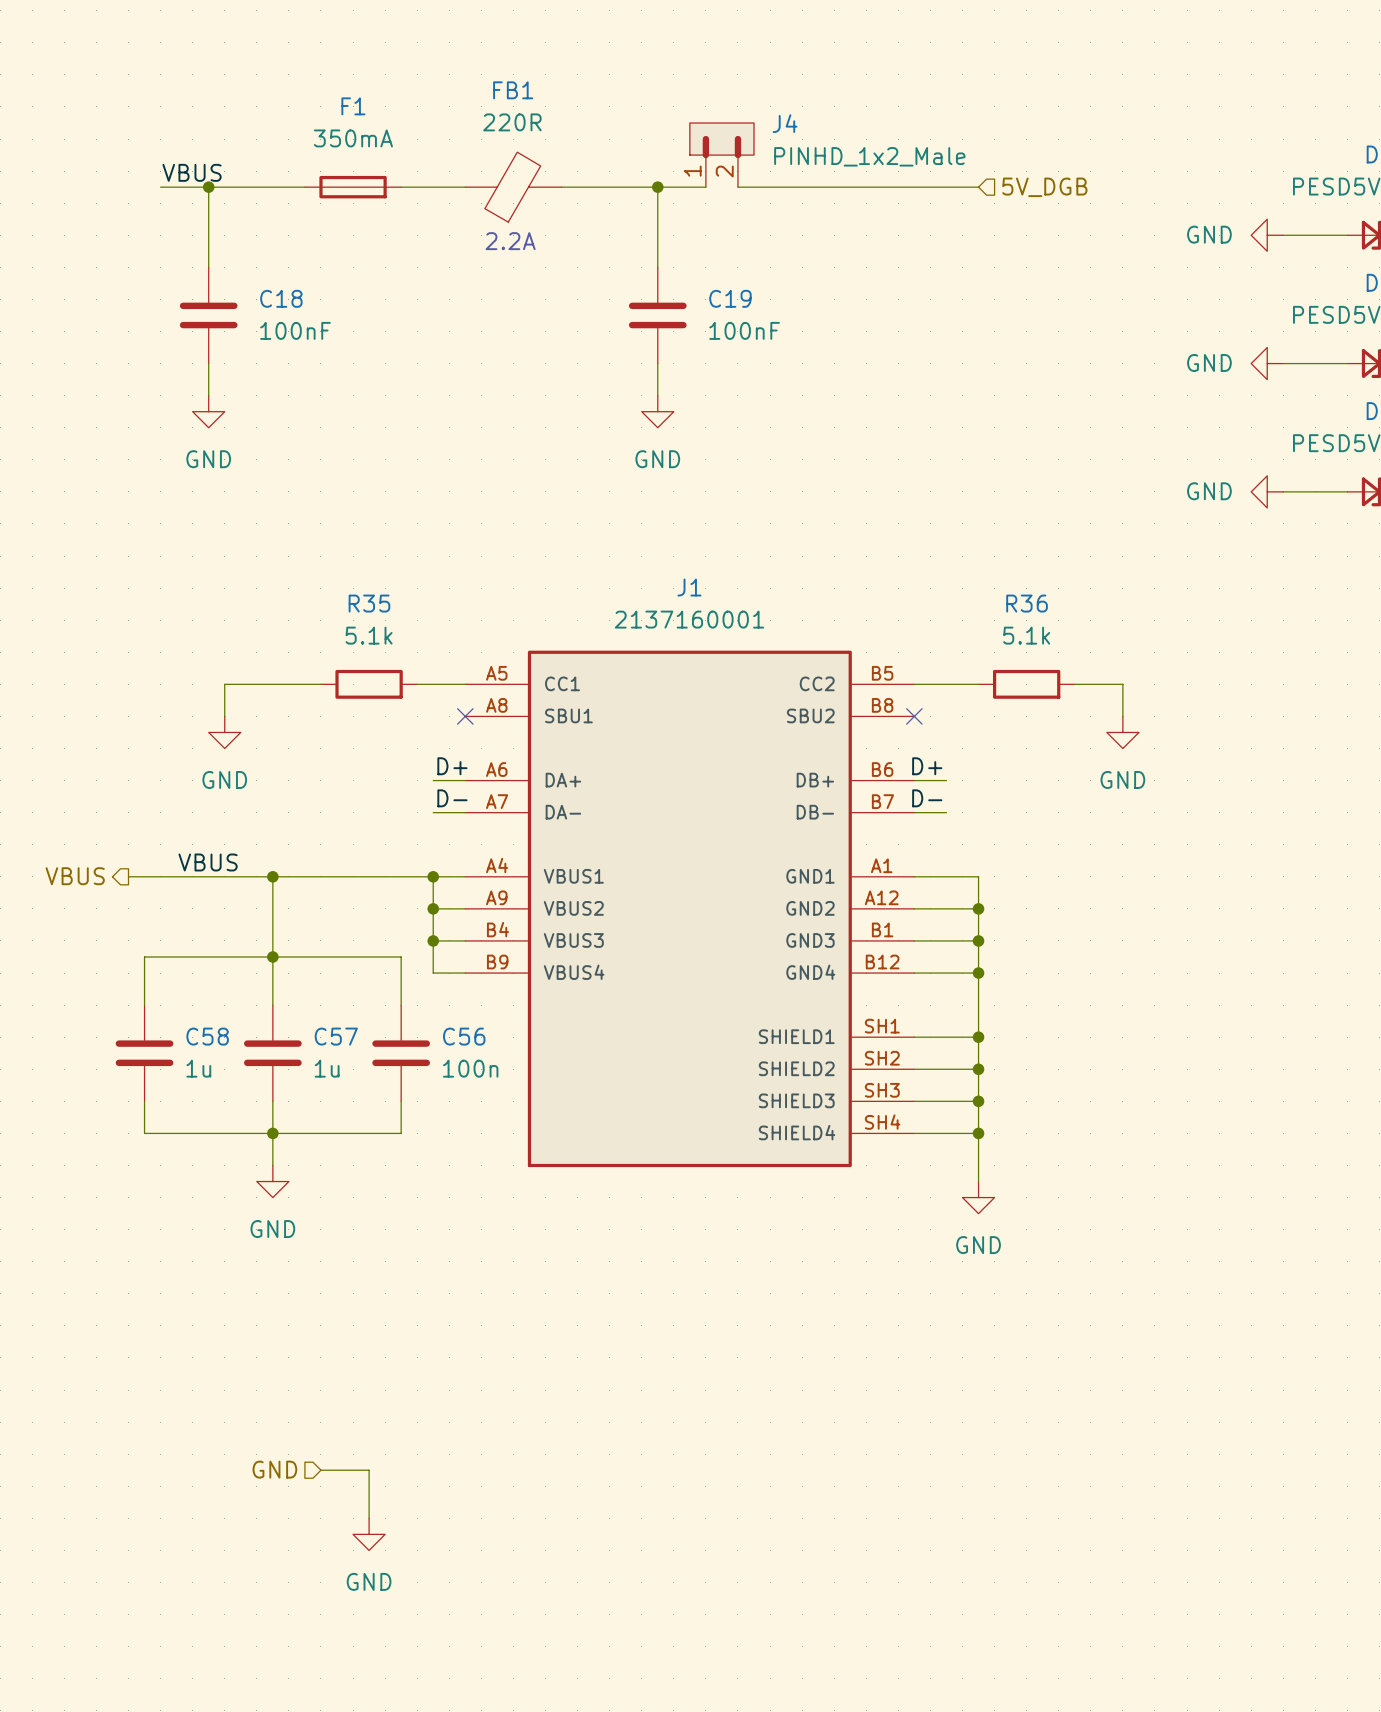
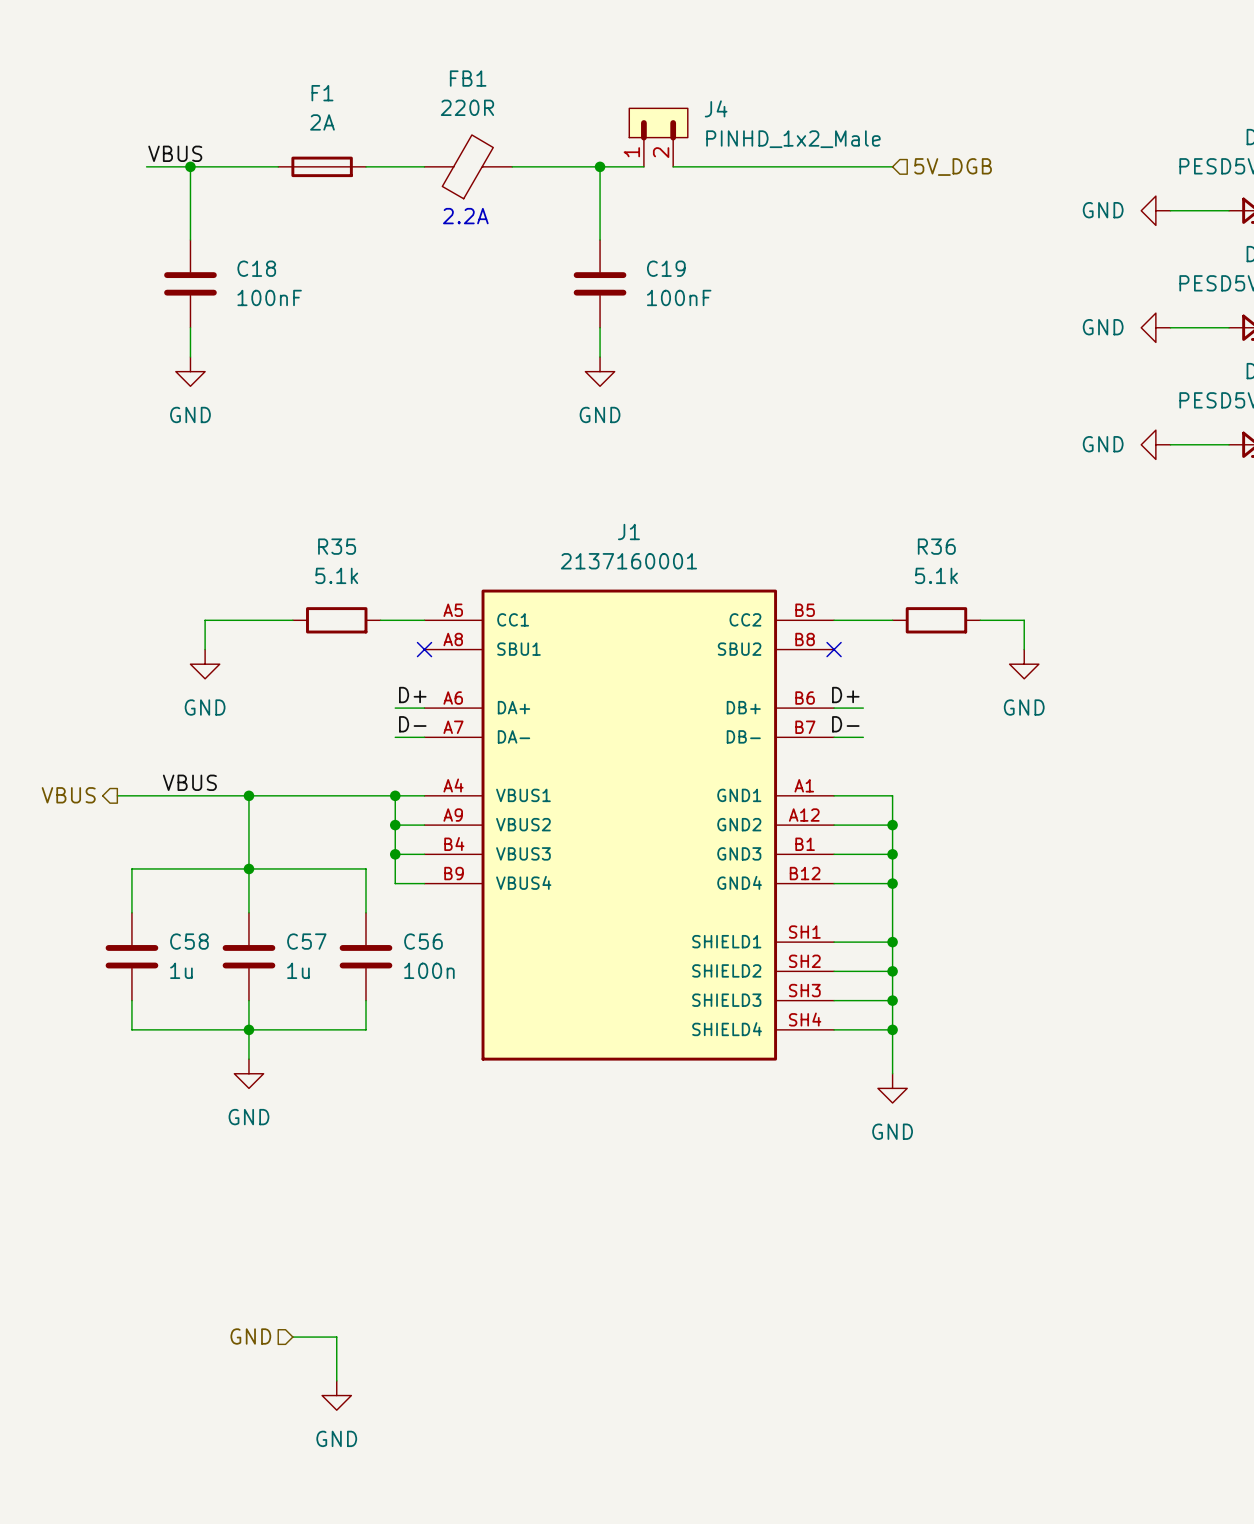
F1 value: 350mA (353, 138) -> 2A (322, 122)

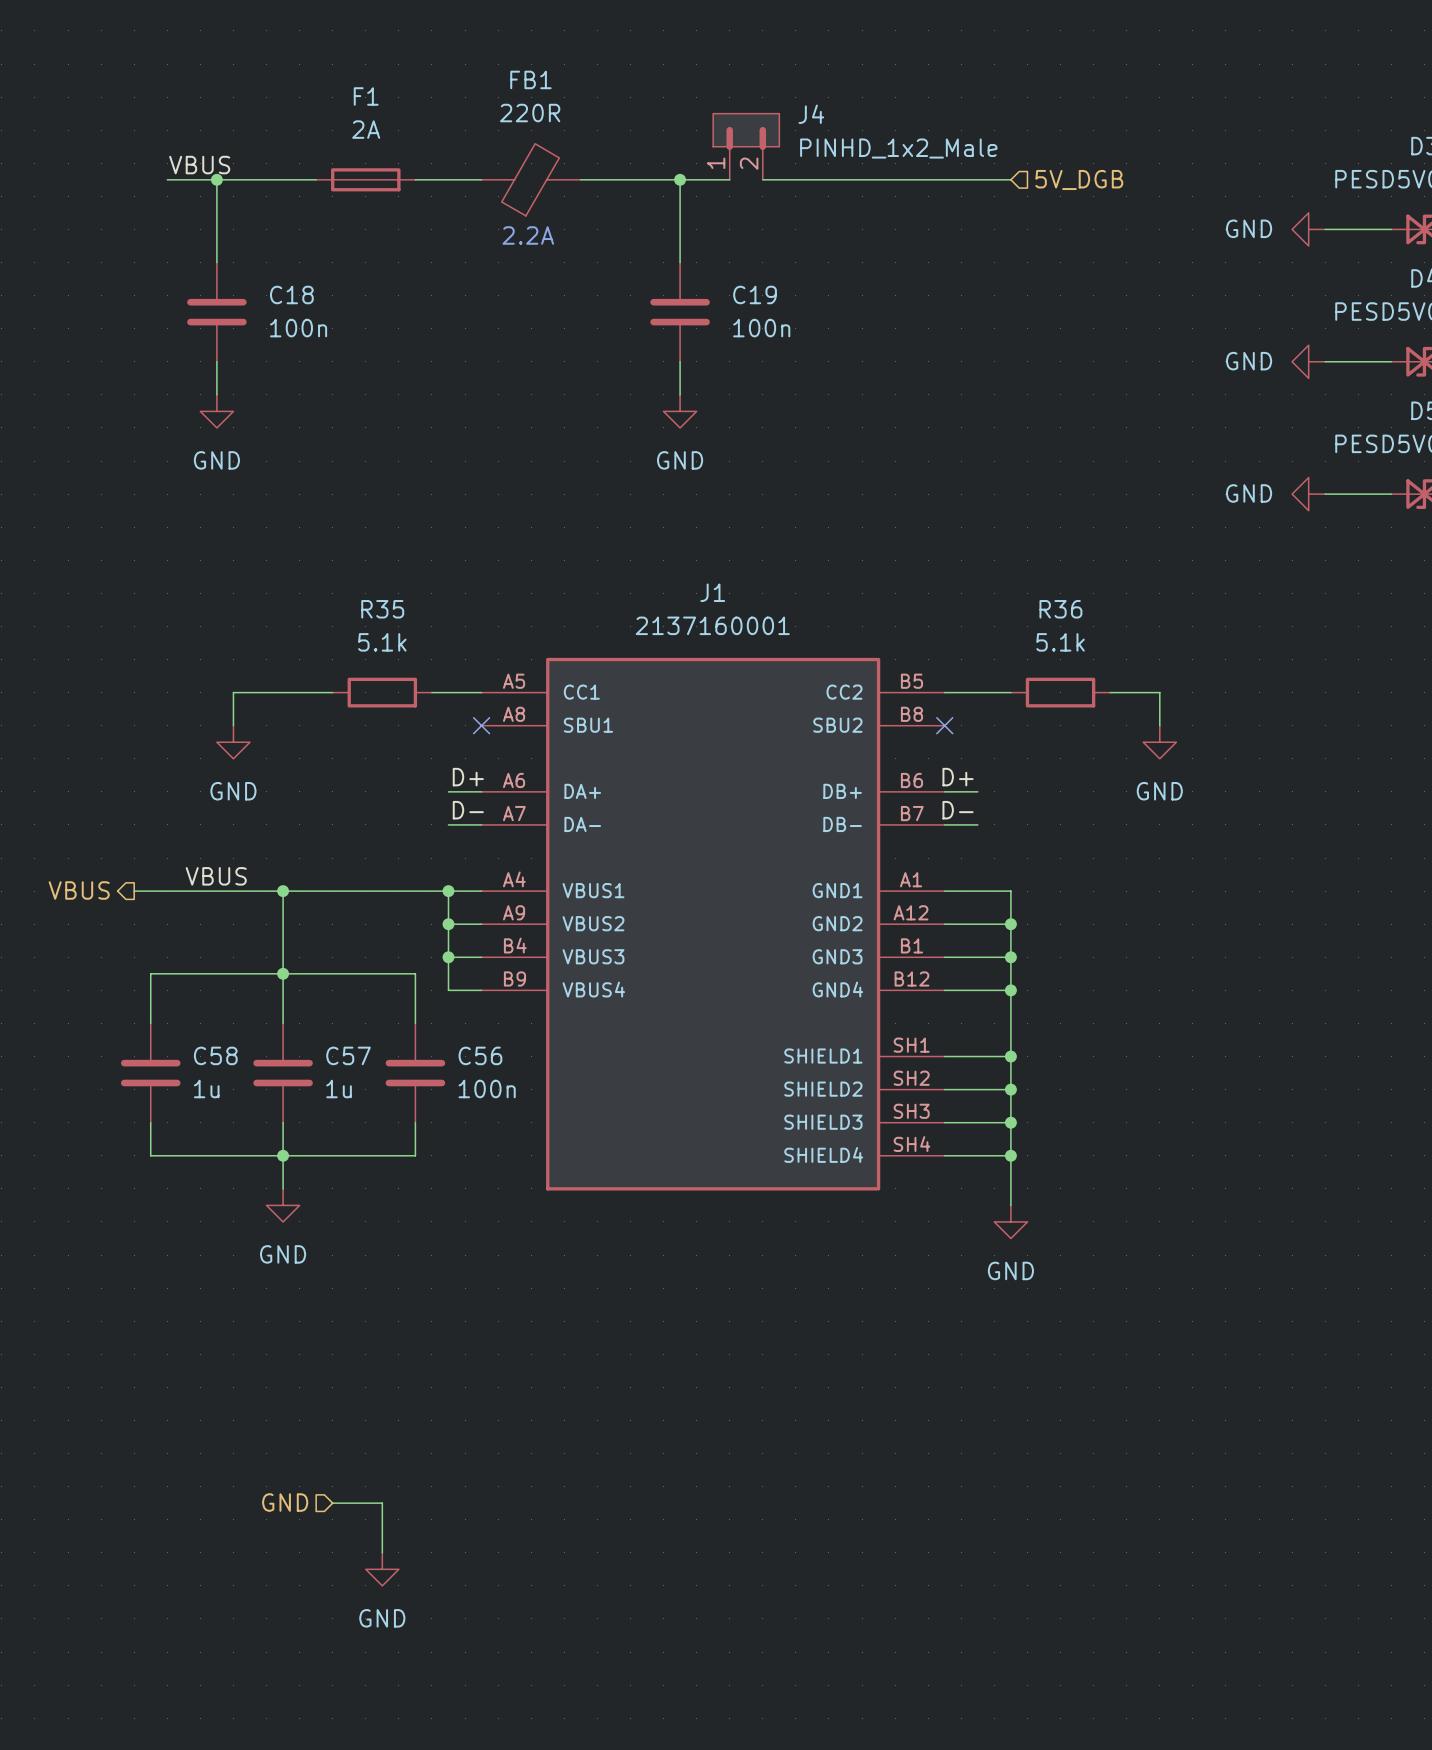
C18 value: 100nF (269, 297) -> 100n (298, 328)
C19 value: 100nF (679, 297) -> 100n (761, 328)

